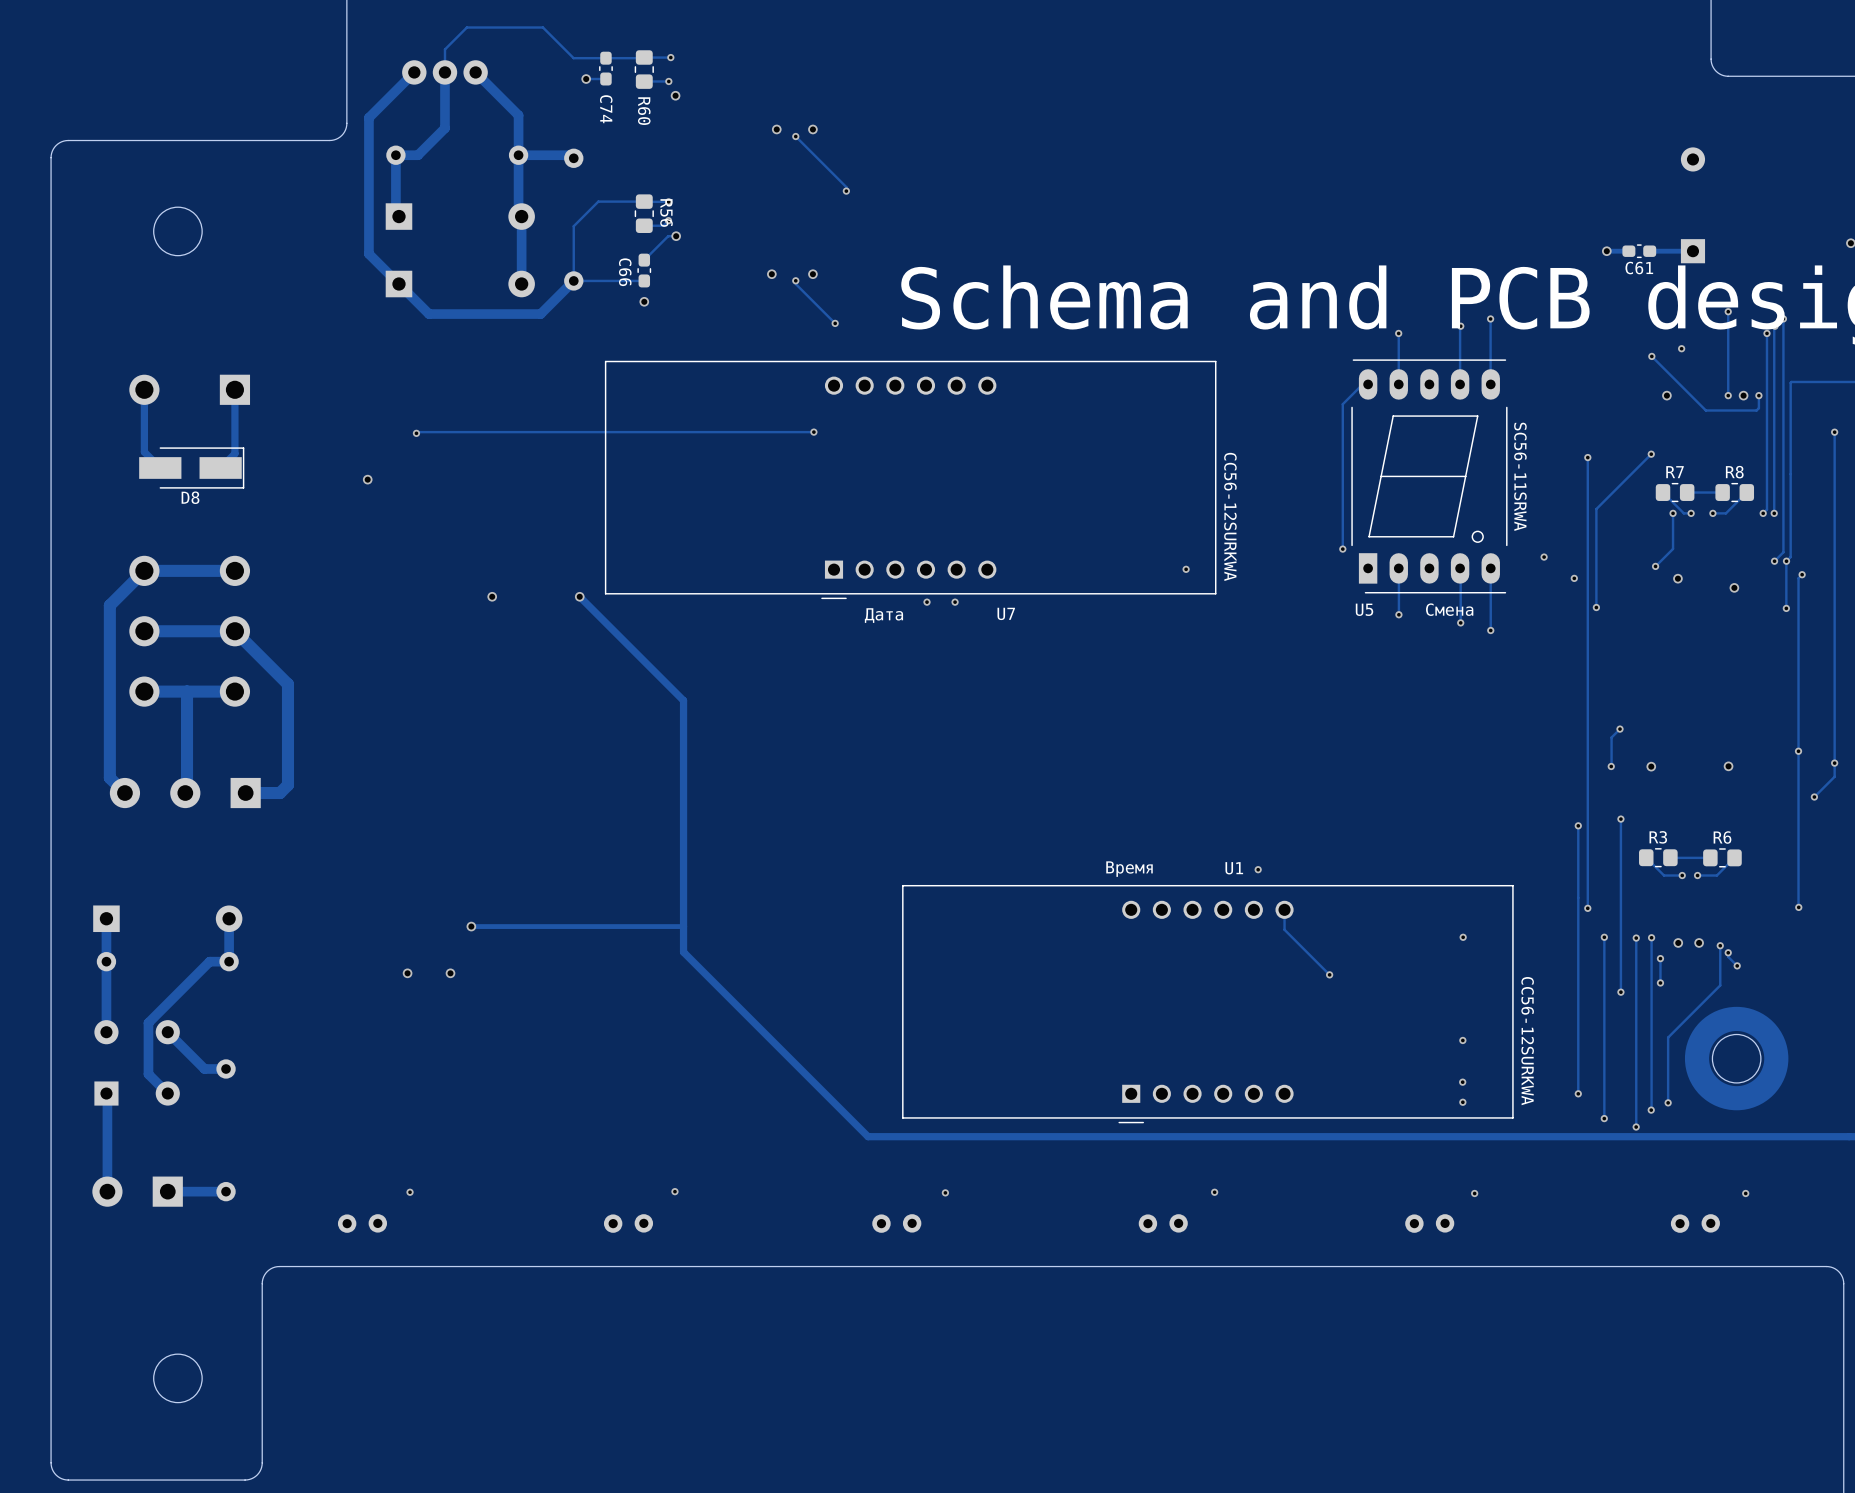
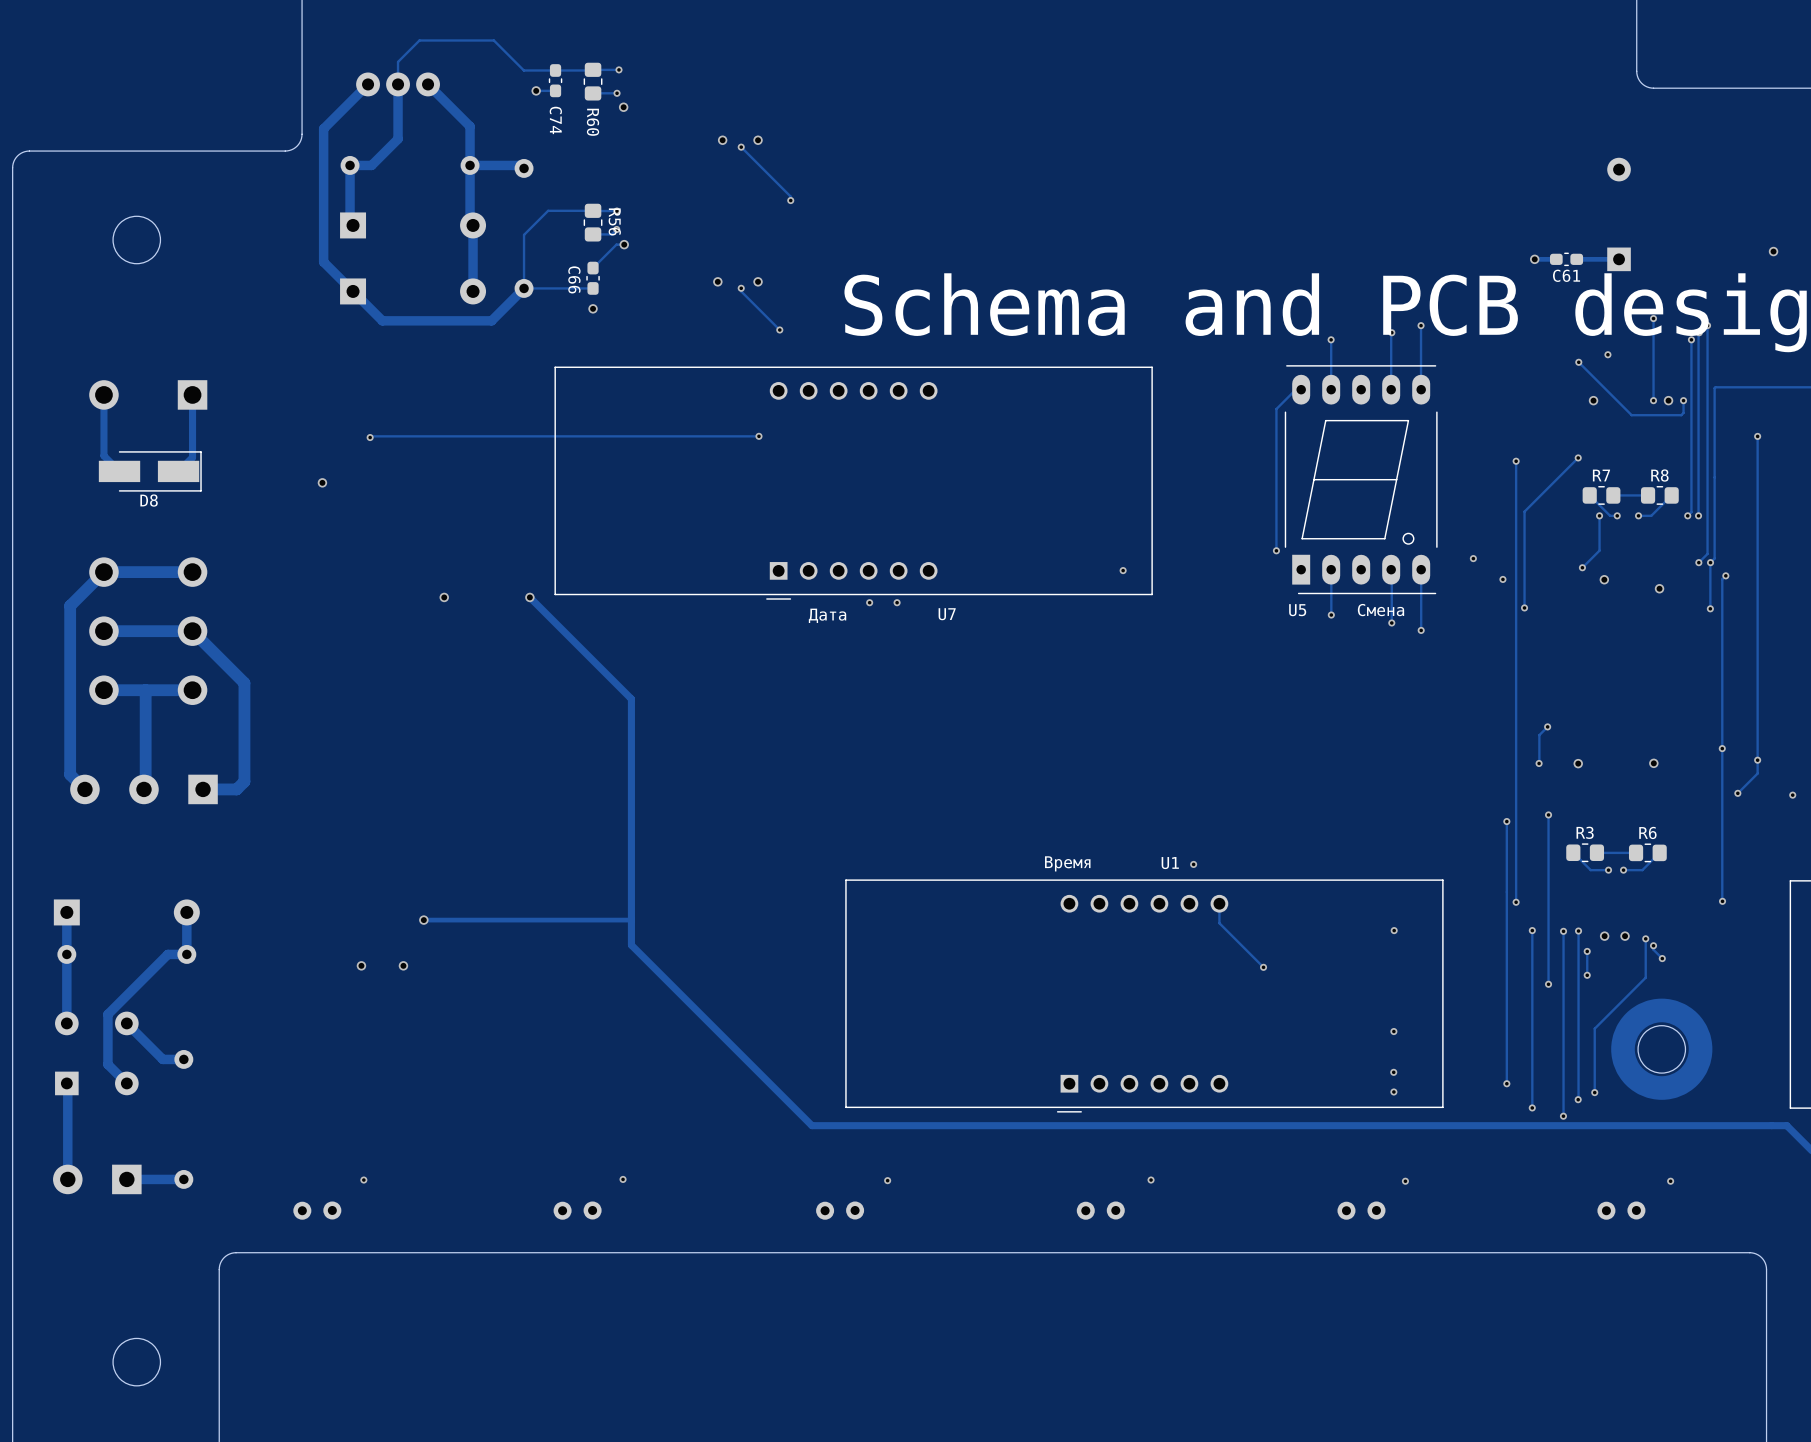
U5 value: SC56-11SRWA (1520, 476) -> none
U7 value: CC56-12SURKWA (1230, 516) -> none
U1 value: CC56-12SURKWA (1527, 1041) -> none

